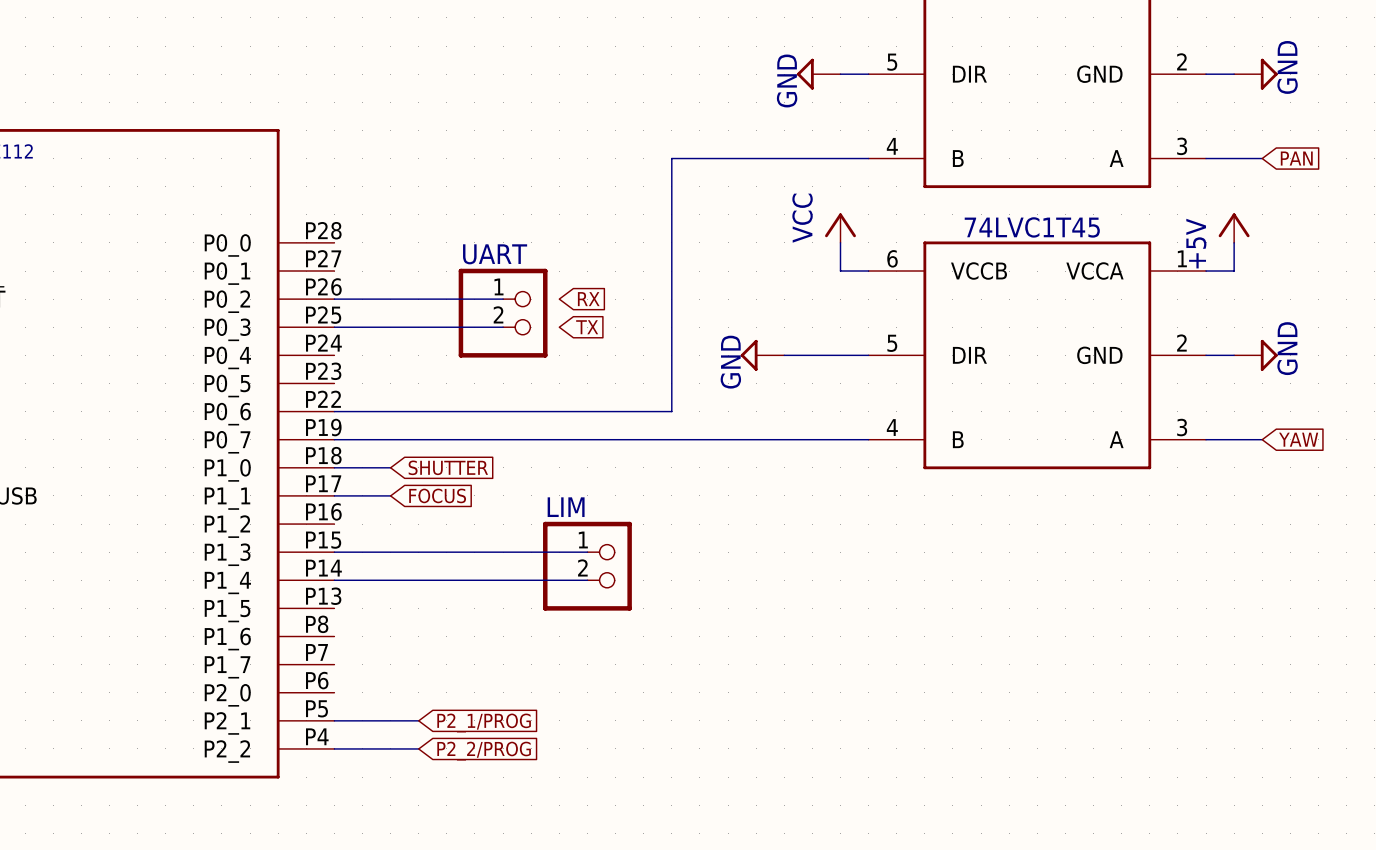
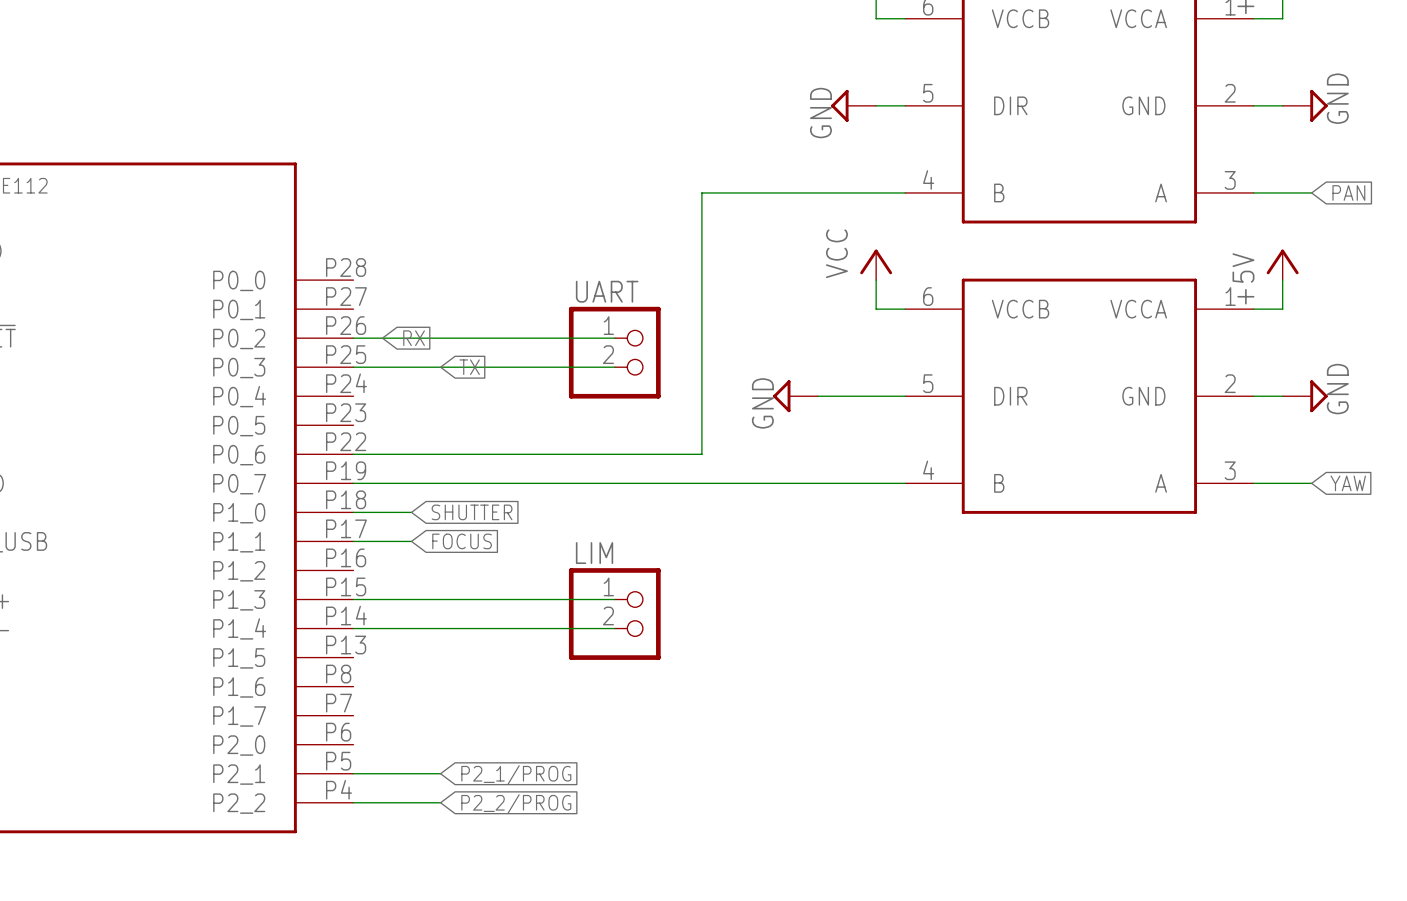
part text: 74LVC1T45 (1032, 227) -> none
wire: none -> (527, 338) (614, 338)
global label position: RX (588, 299) -> RX (414, 338)
UART position: (503, 313) -> (614, 352)
wire: none -> (527, 367) (614, 367)
global label position: TX (587, 327) -> TX (469, 367)

